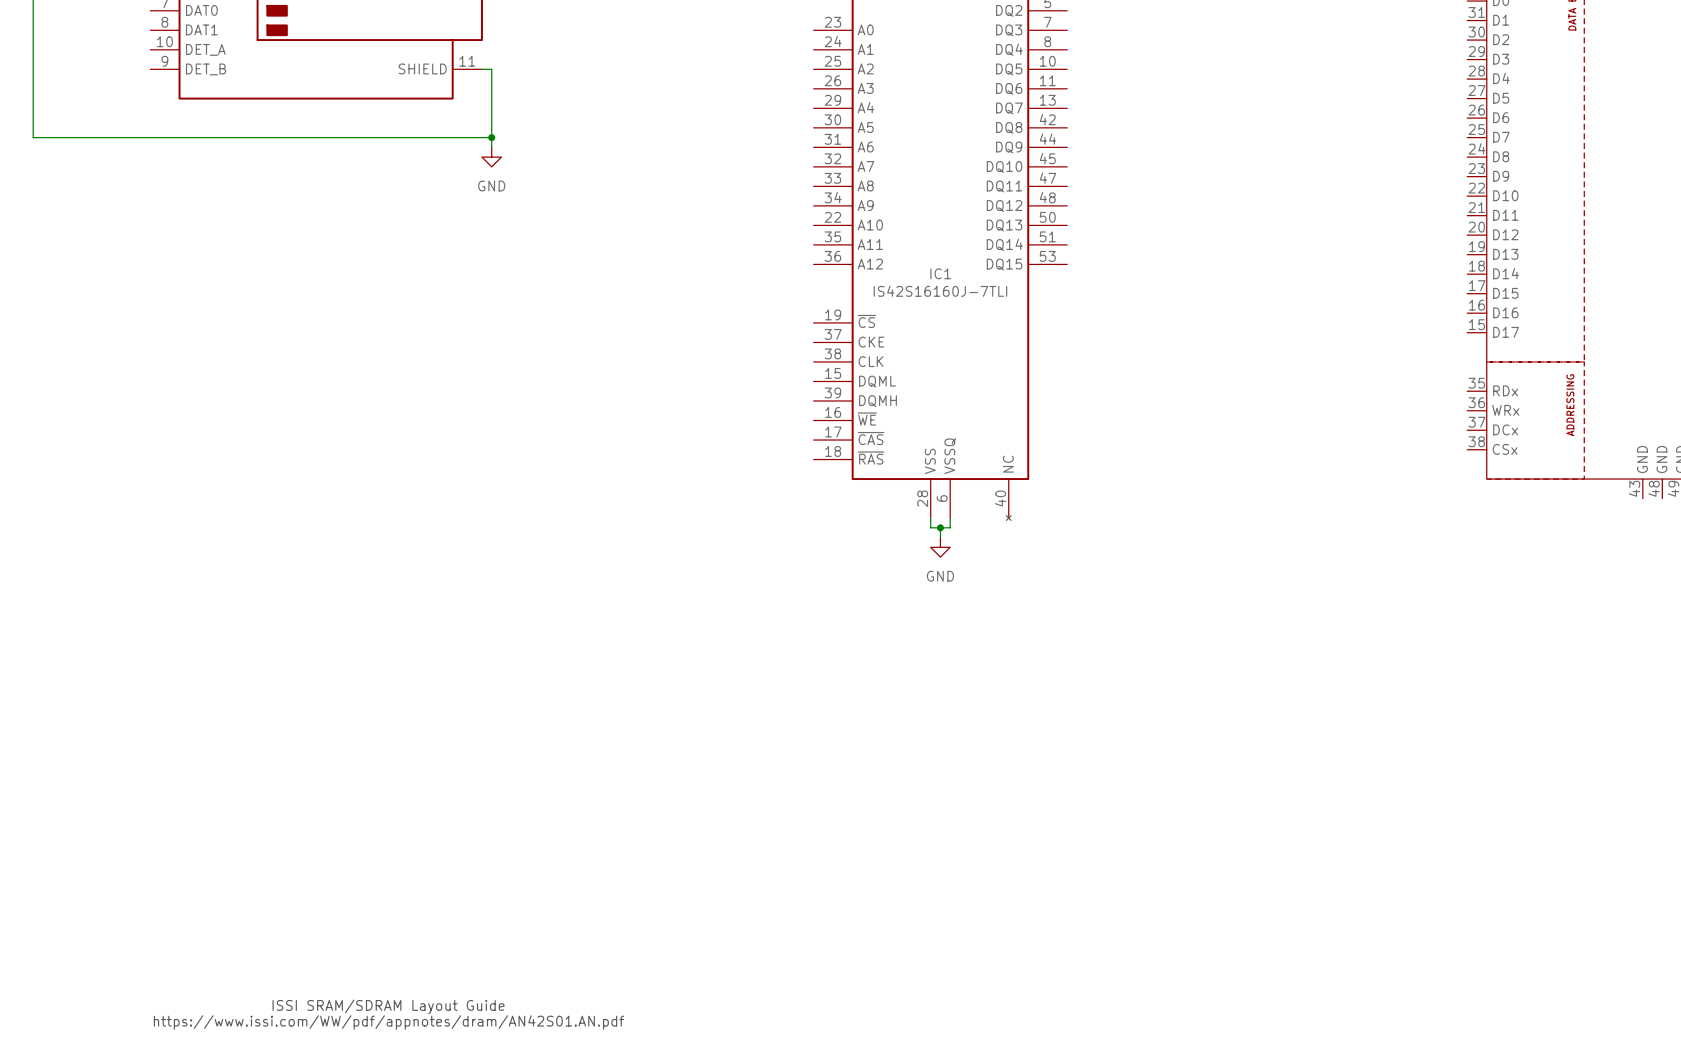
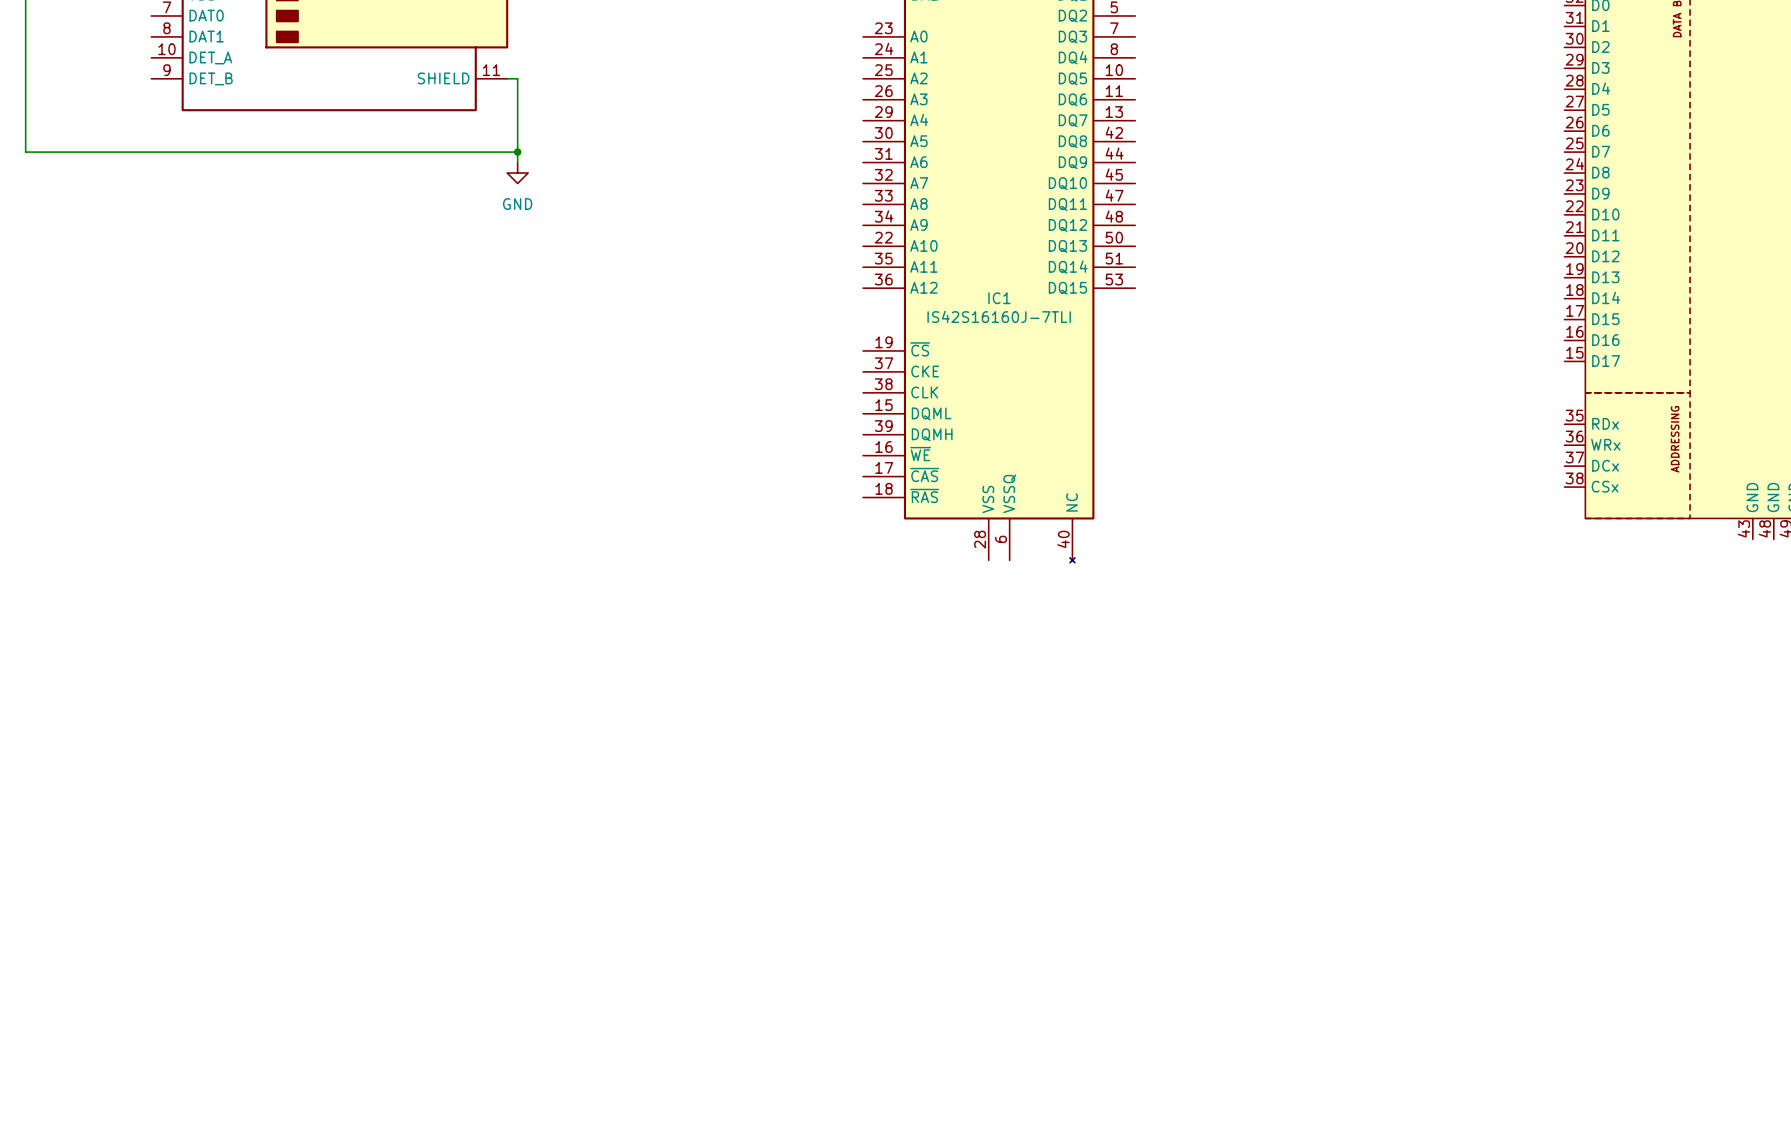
wire: (930, 518) (930, 527) (950, 527) (950, 518) -> none
wire: (940, 527) (940, 537) -> none
junction: (940, 527) -> none
power symbol: GND (940, 547) -> none
text: ISSI SRAM/SDRAM Layout Guide (388, 1006) -> none
text: https://www.issi.com/WW/pdf/appnotes/dram/AN42S01.AN.pdf (389, 1022) -> none

